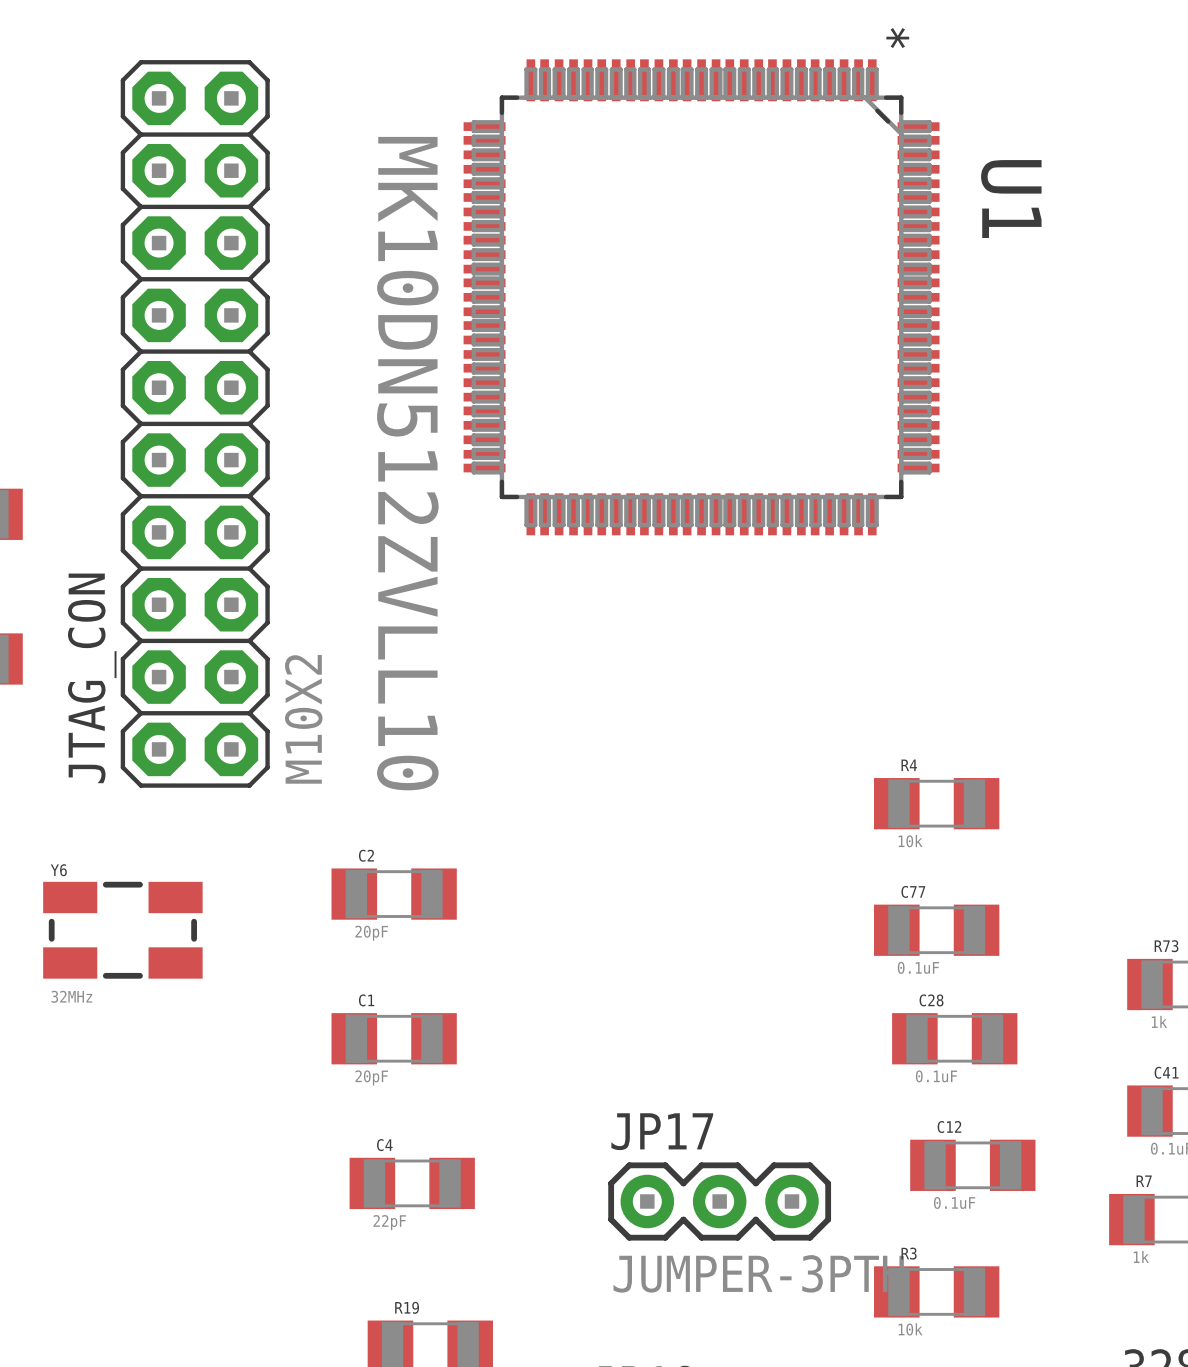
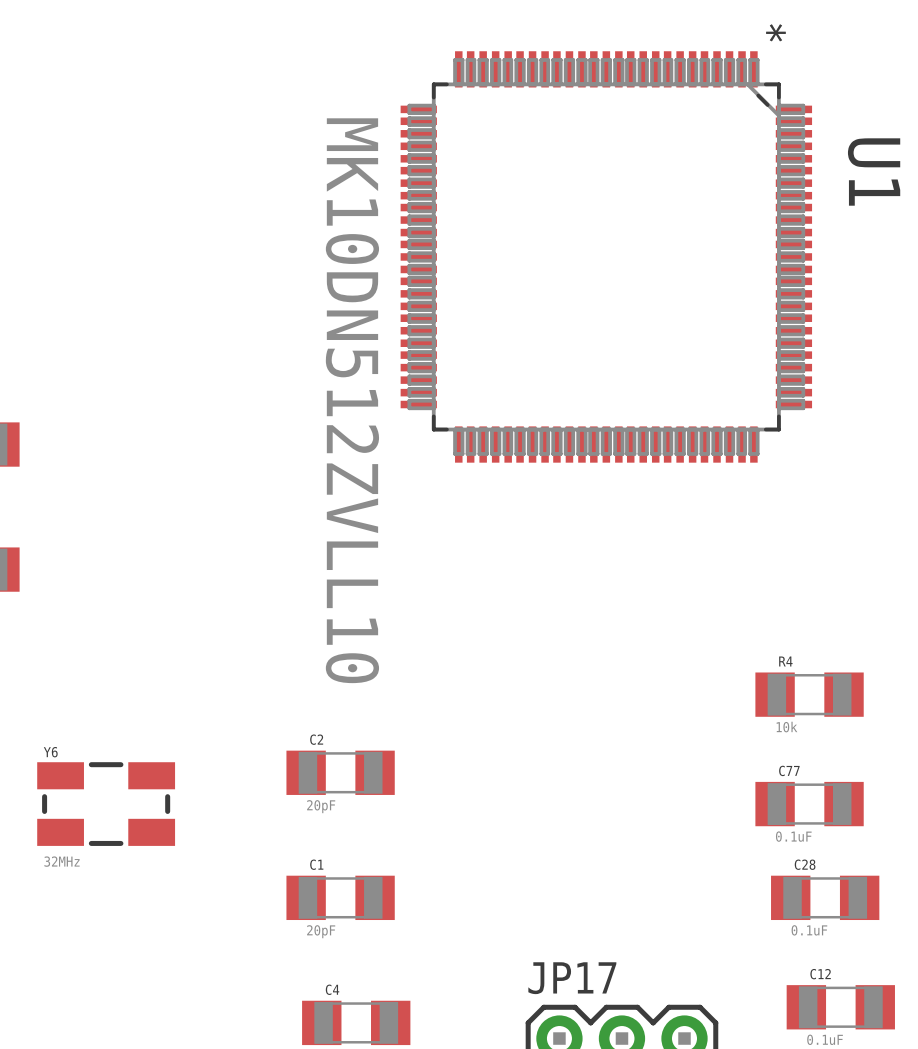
JTAG_CON: M10X2 (195, 423) -> none

